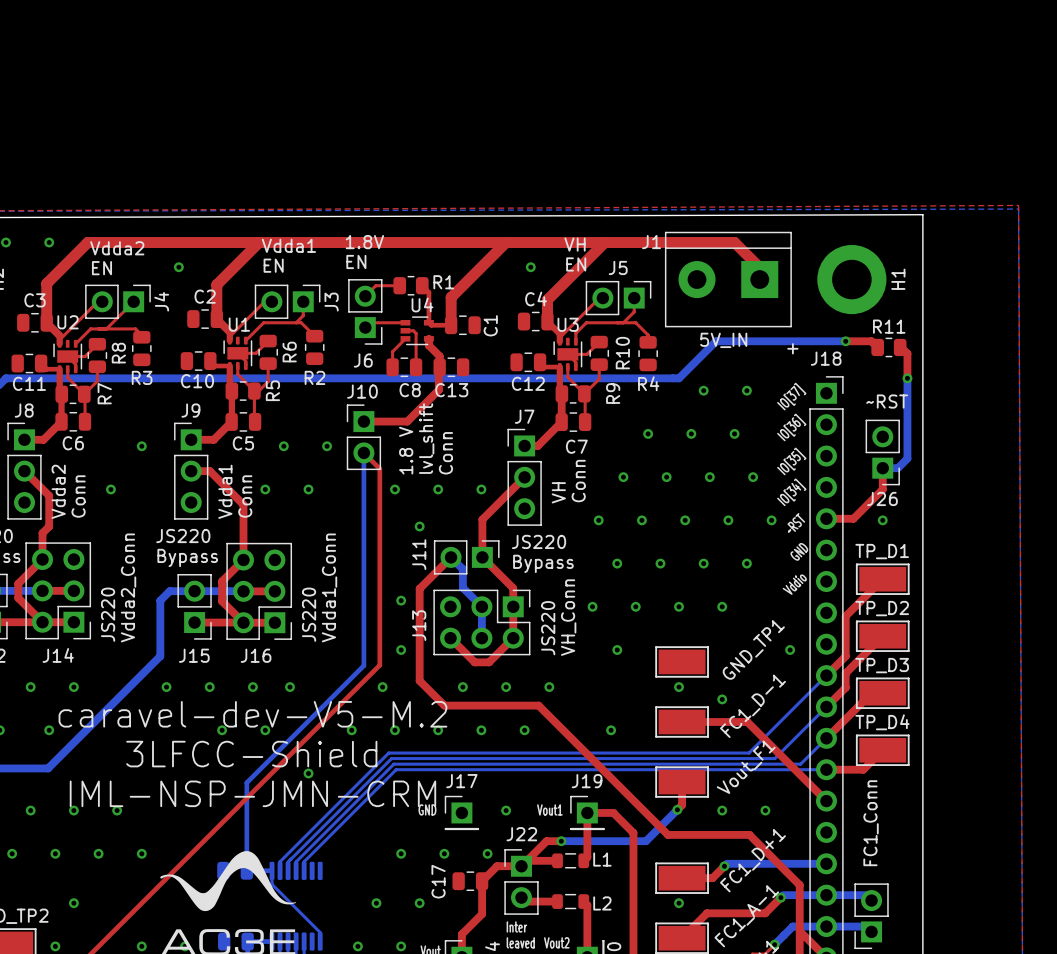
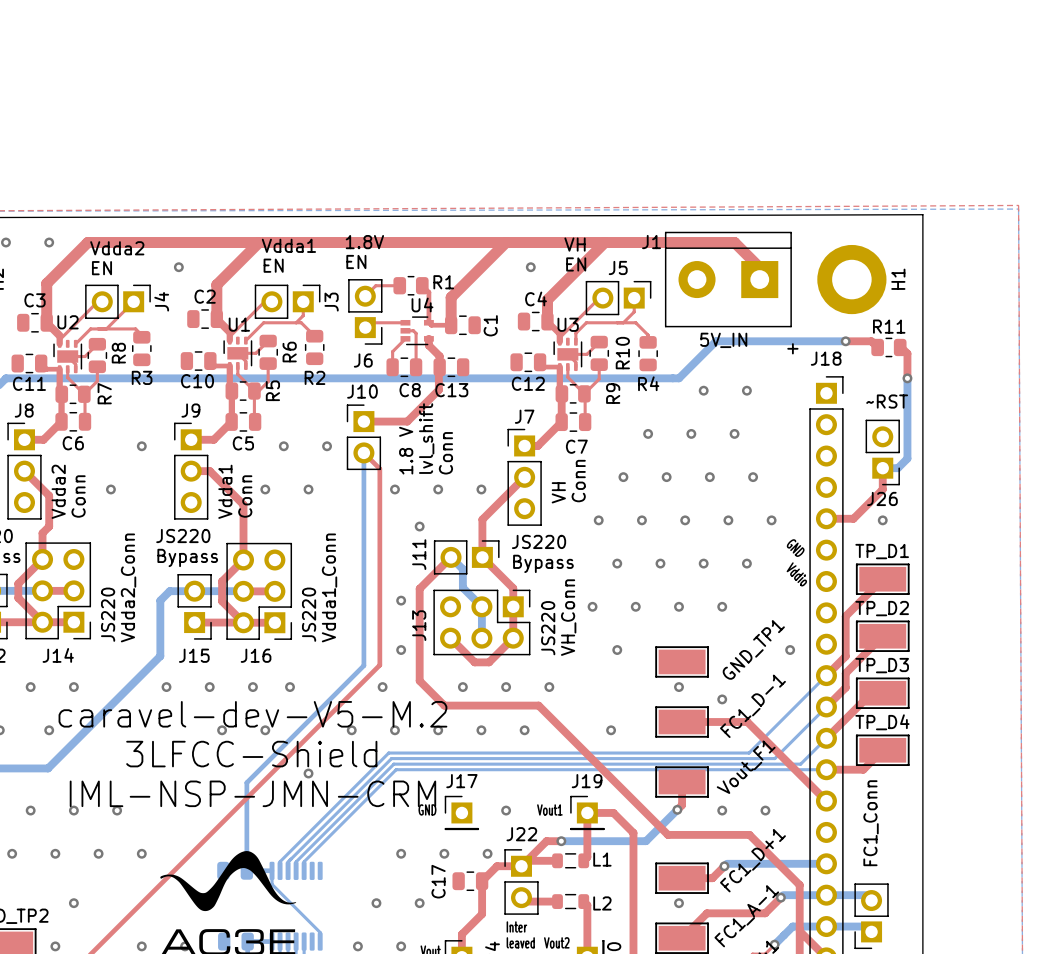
text: IO[37] (791, 396) -> none
text: IO[36] (791, 427) -> none
text: IO[35] (791, 461) -> none
text: IO[34] (791, 492) -> none
text: ~RST (796, 523) -> GND (795, 548)
text: GND (799, 551) -> none
text rotation: 0° (794, 584) -> 90° clockwise (796, 574)

